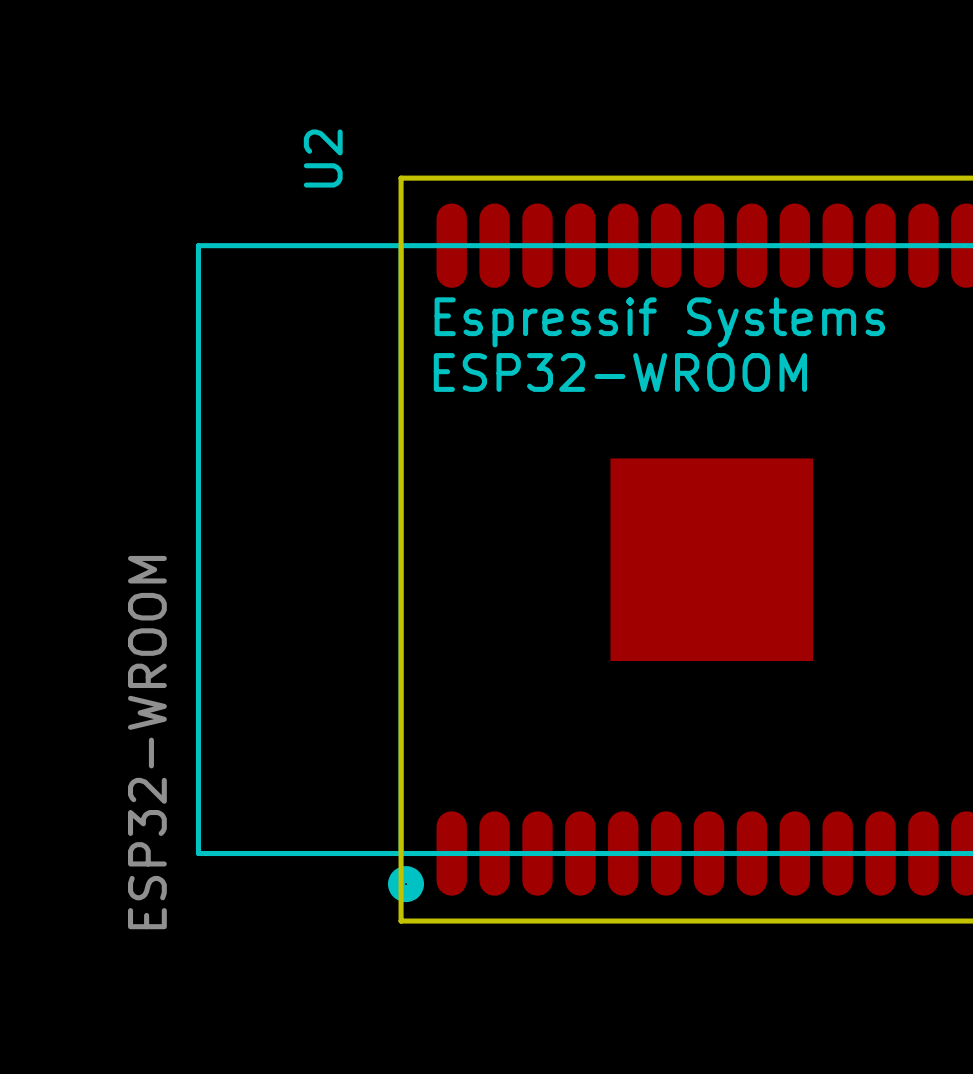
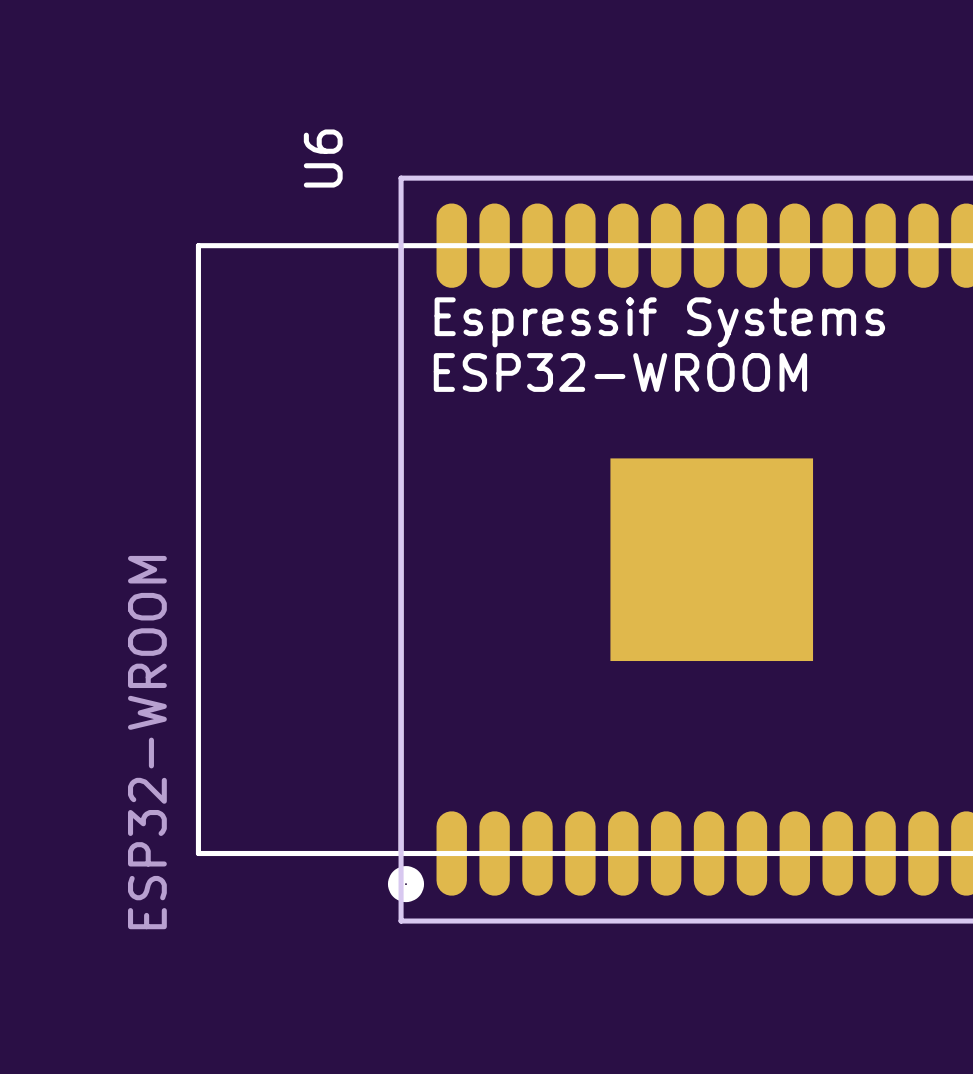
U2 name: U2 (323, 158) -> U6 (323, 158)

